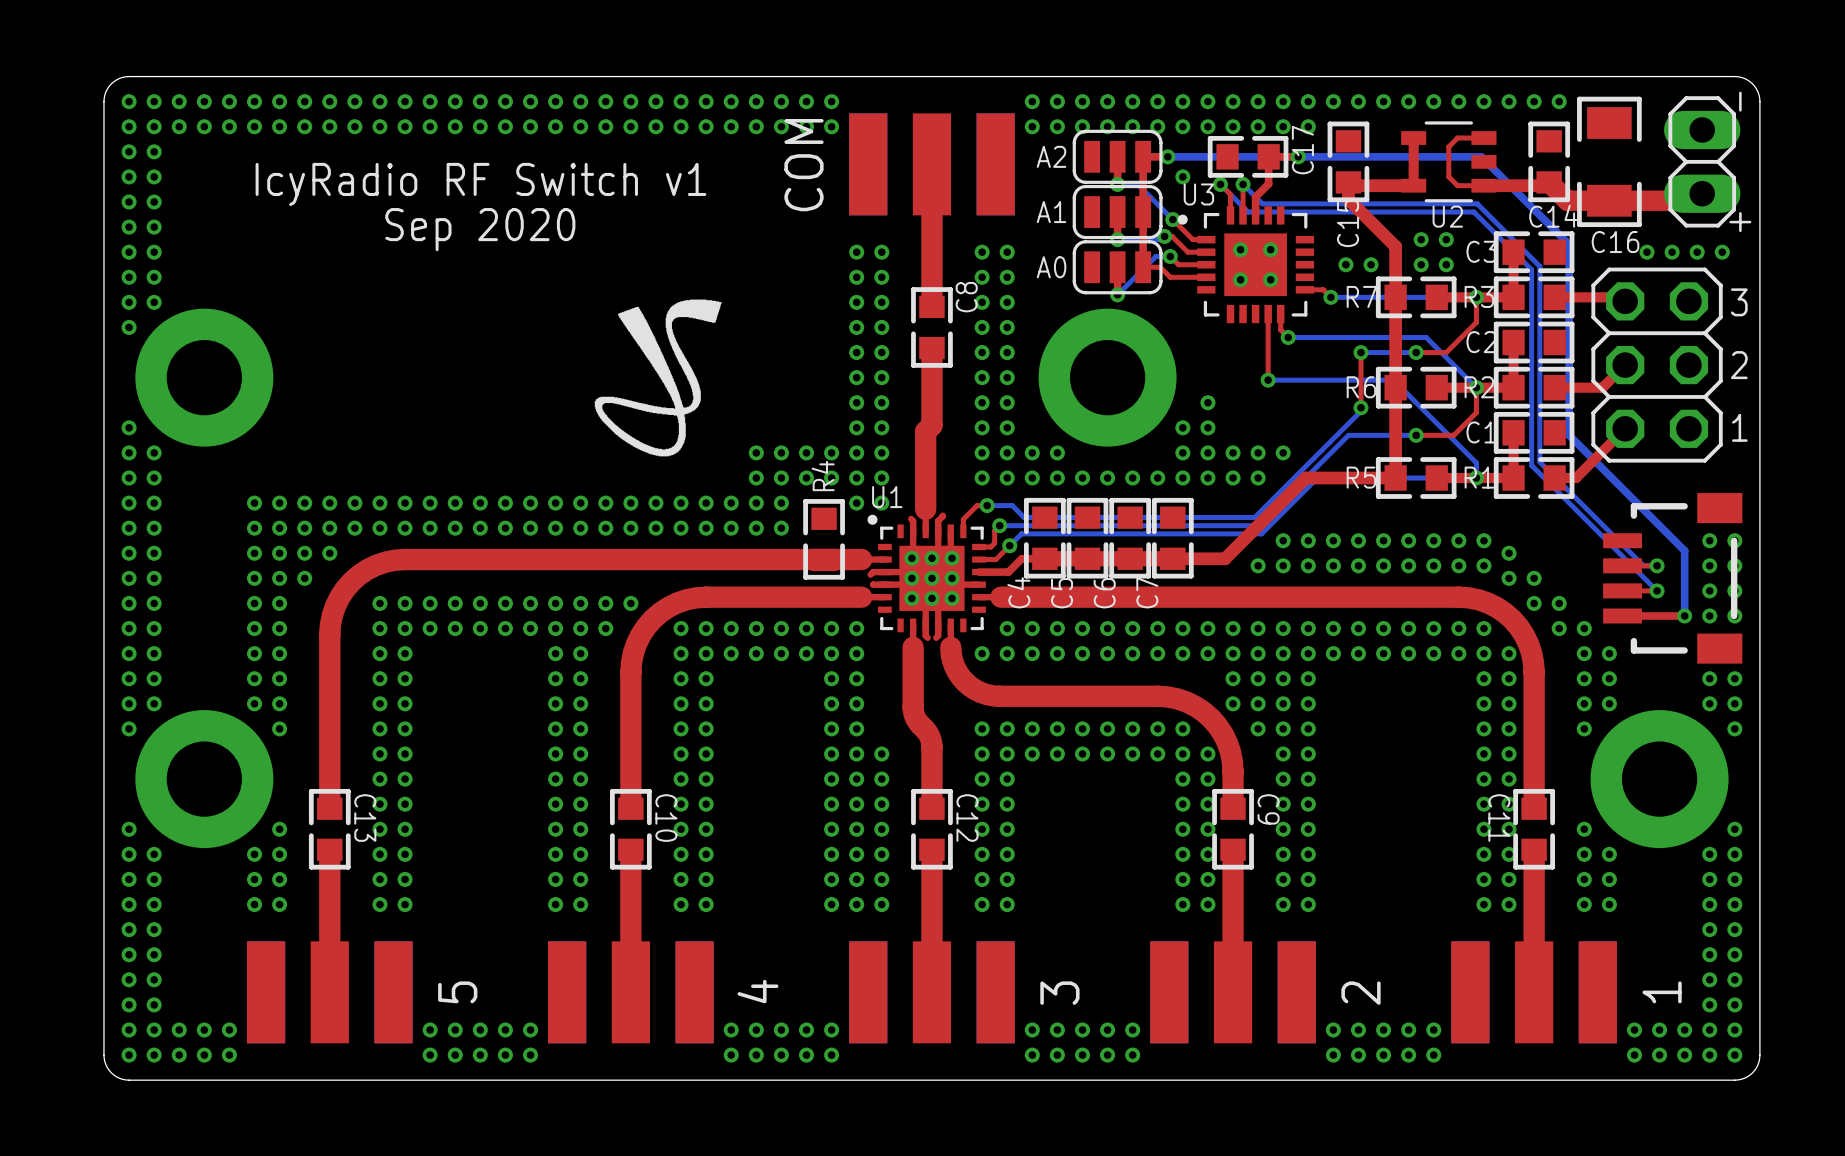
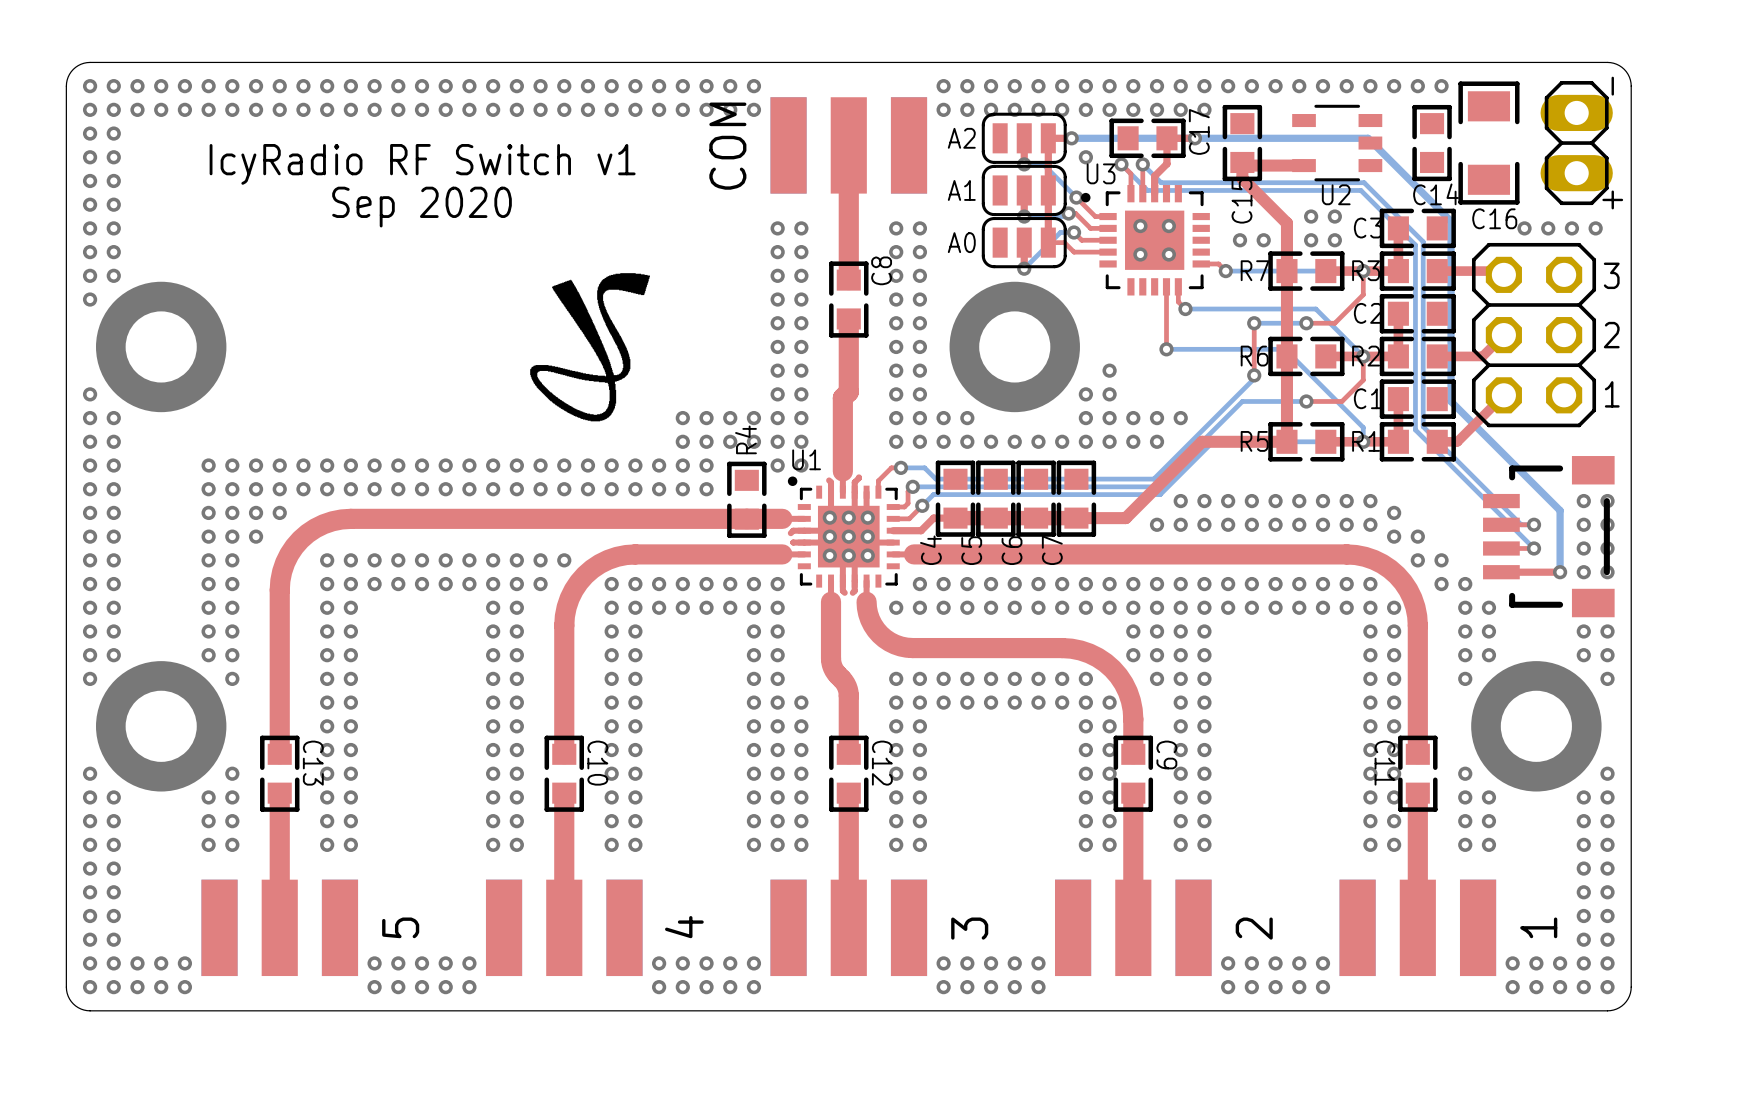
top track: (1413, 138) (1413, 185) -> none
top track: (1483, 138) (1457, 138) (1448, 146) (1448, 176) (1457, 185) (1545, 185) (1549, 182) (1567, 200) (1695, 200) (1702, 193) -> none

